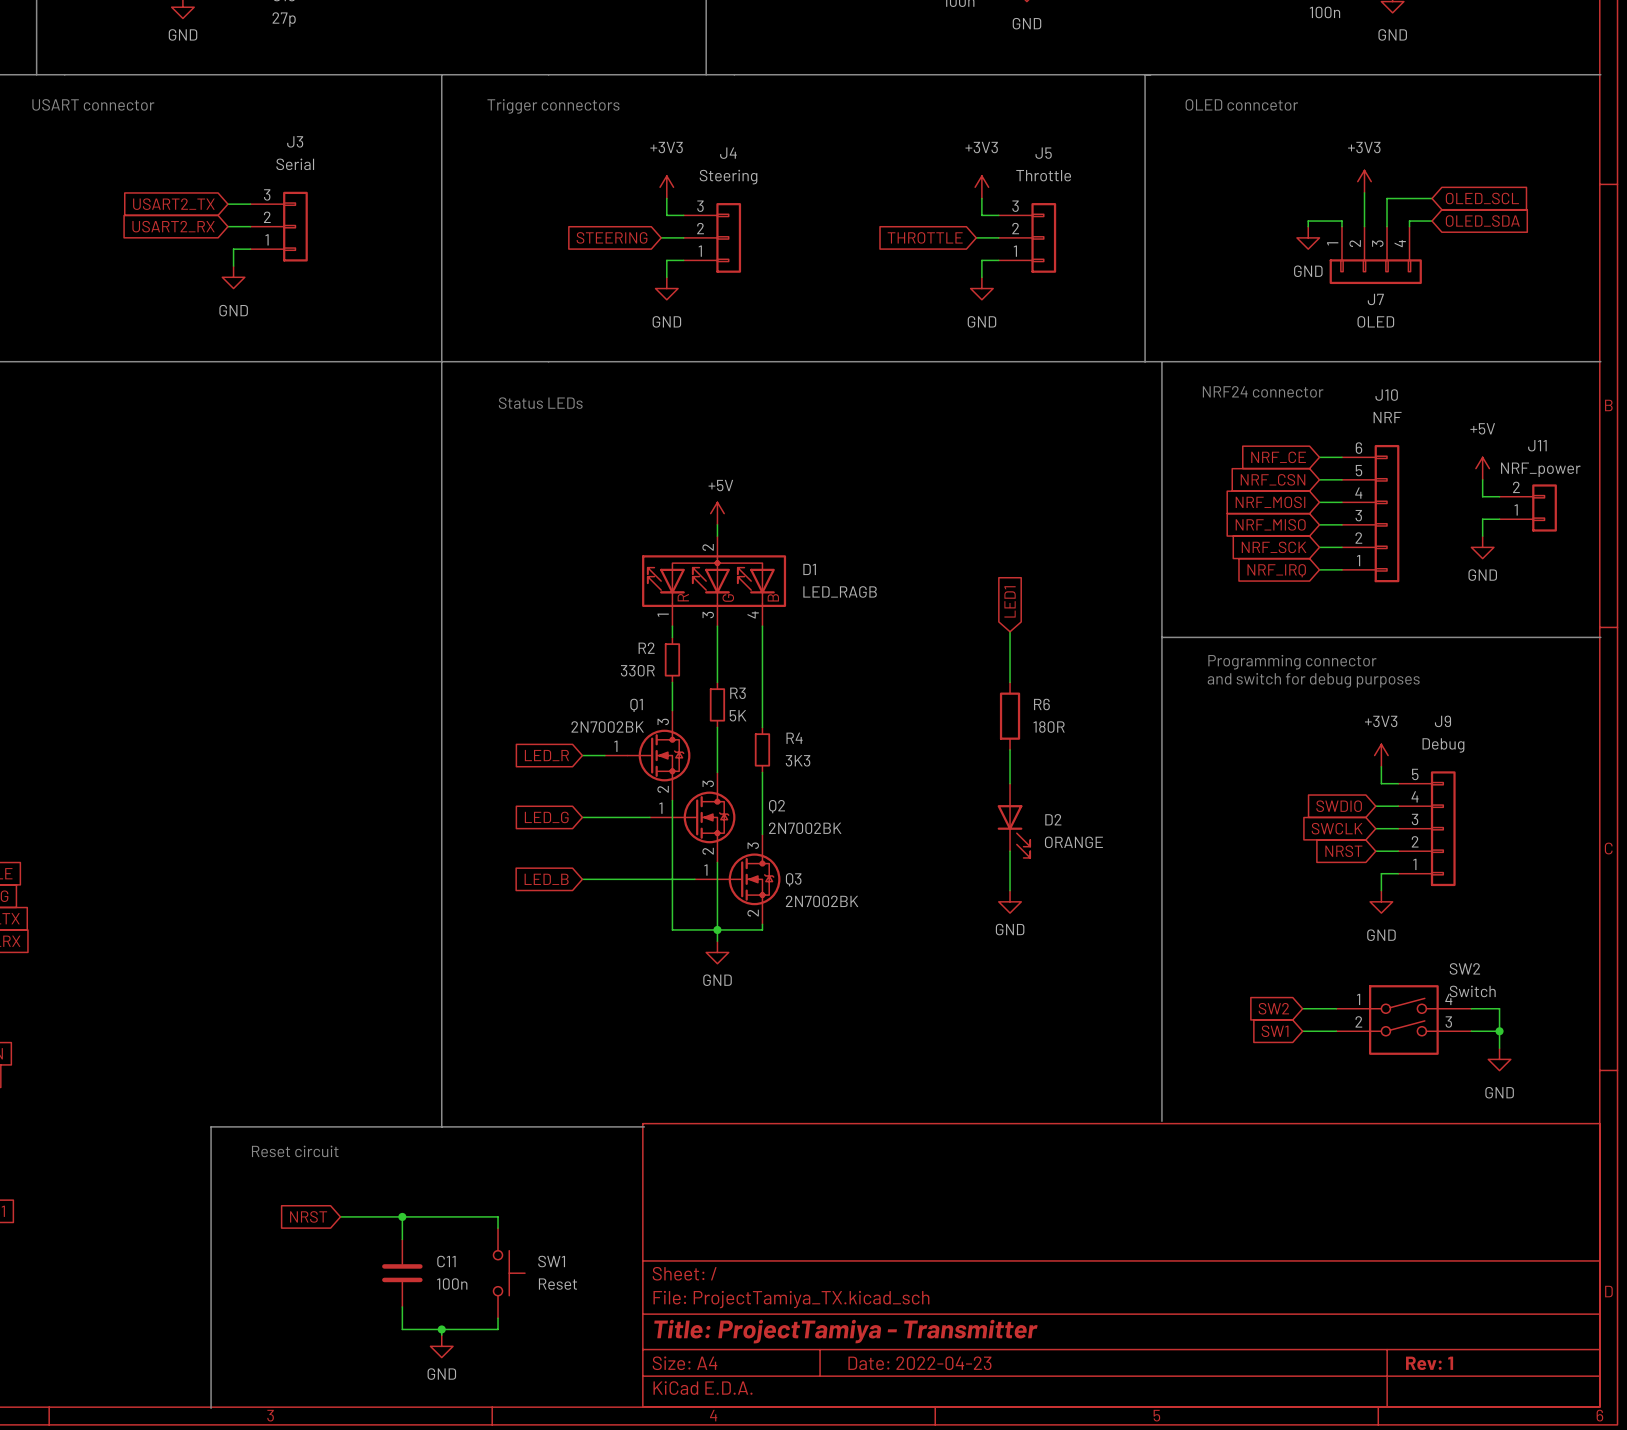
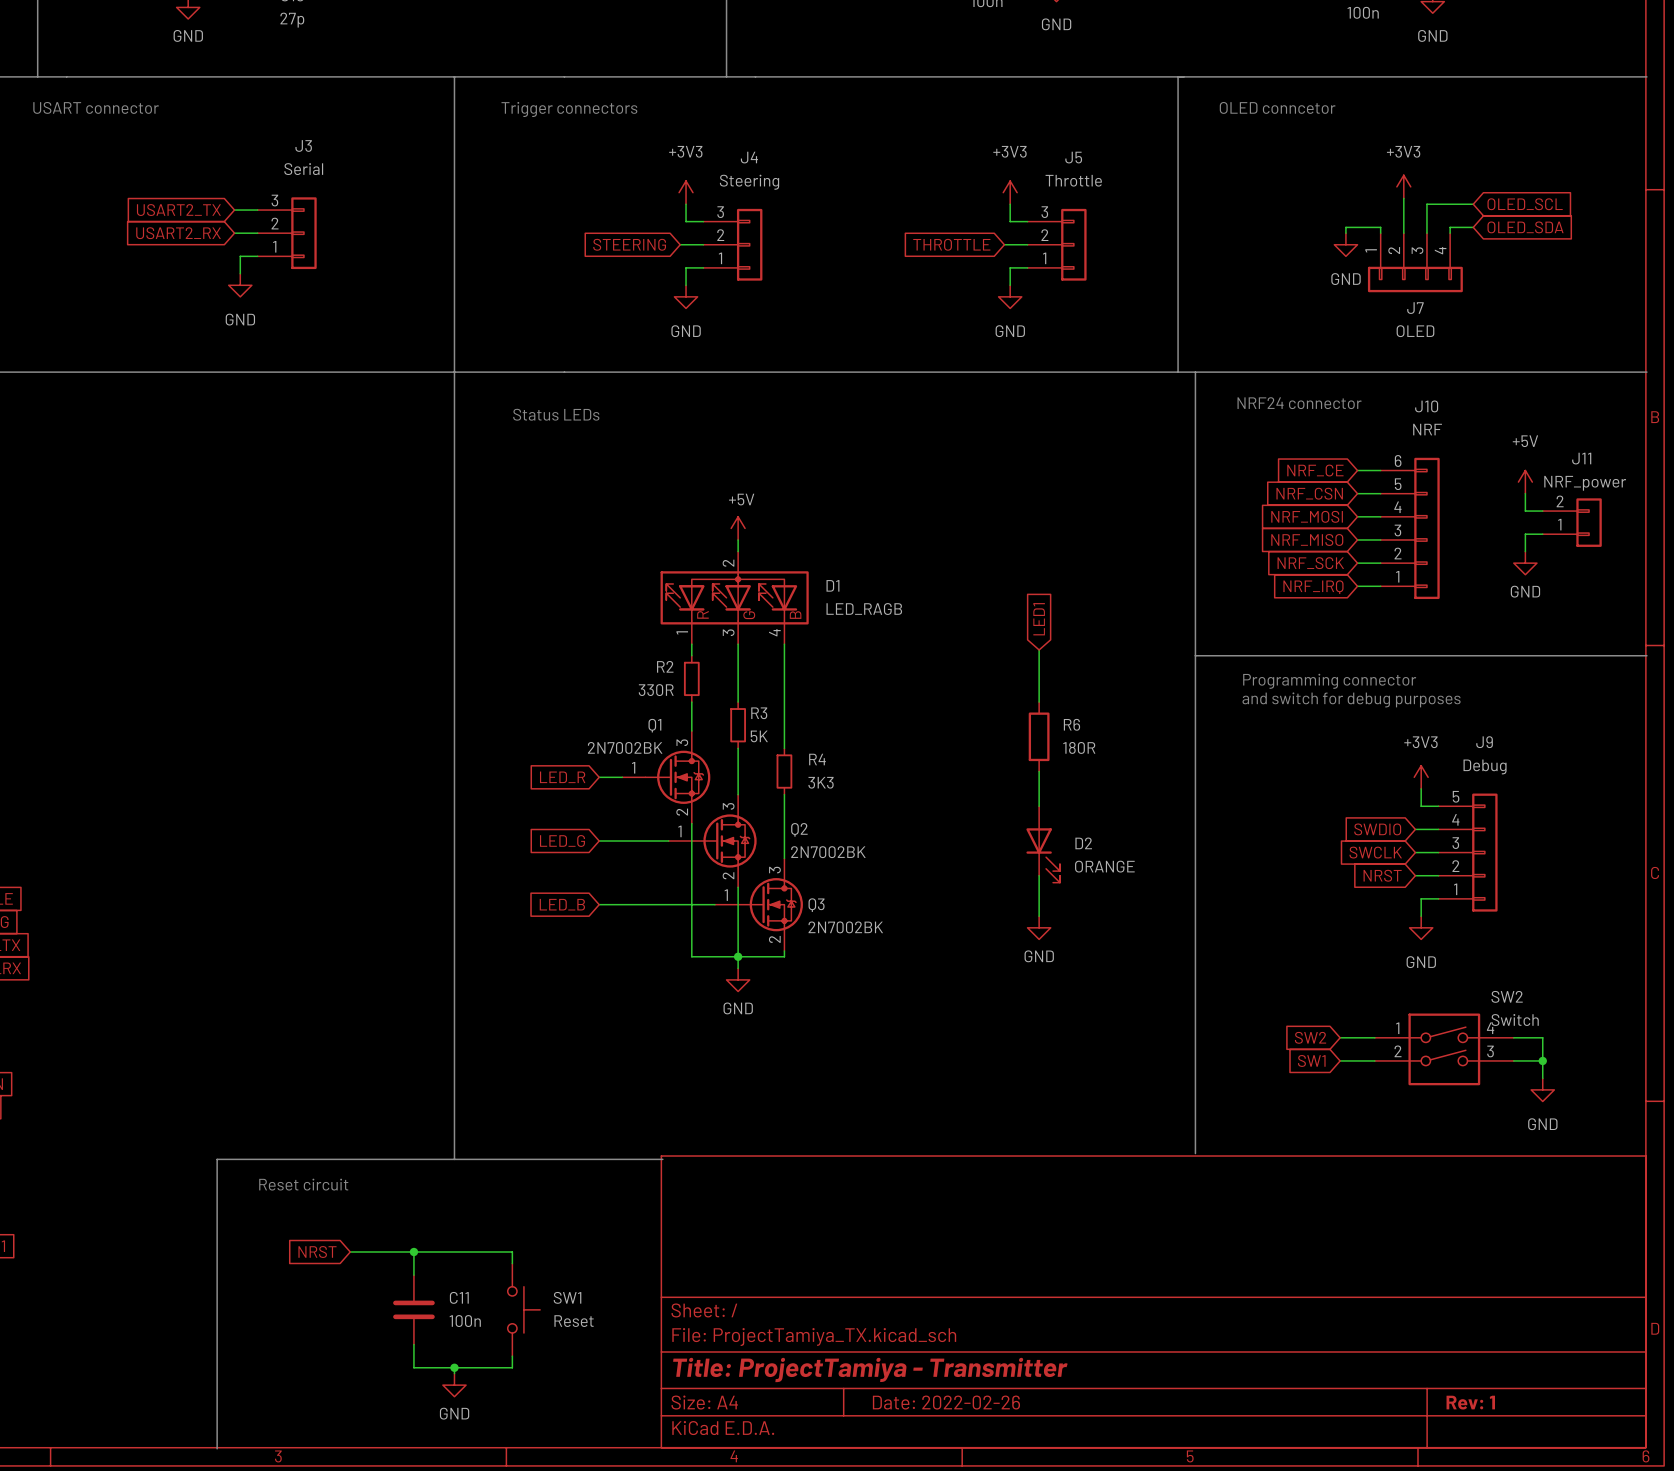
title block: Date: 2022-04-23 (919, 1363) -> Date: 2022-02-26 (946, 1402)

